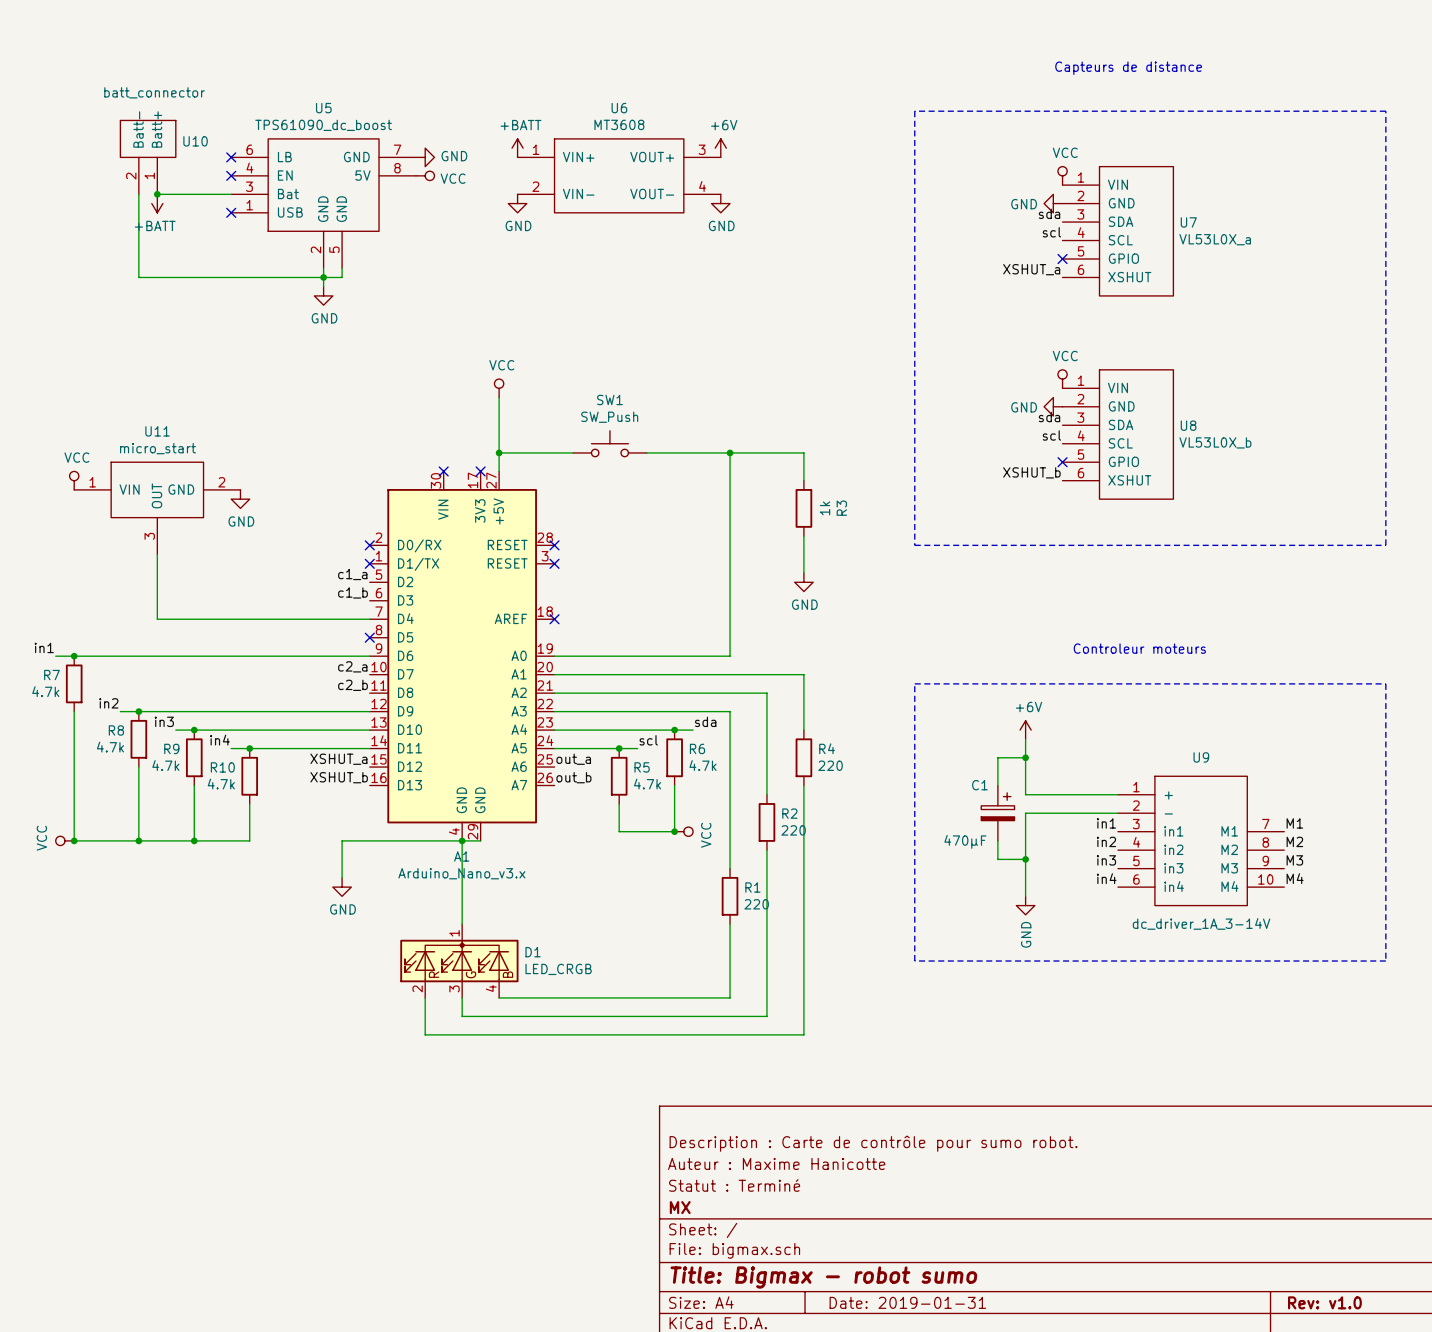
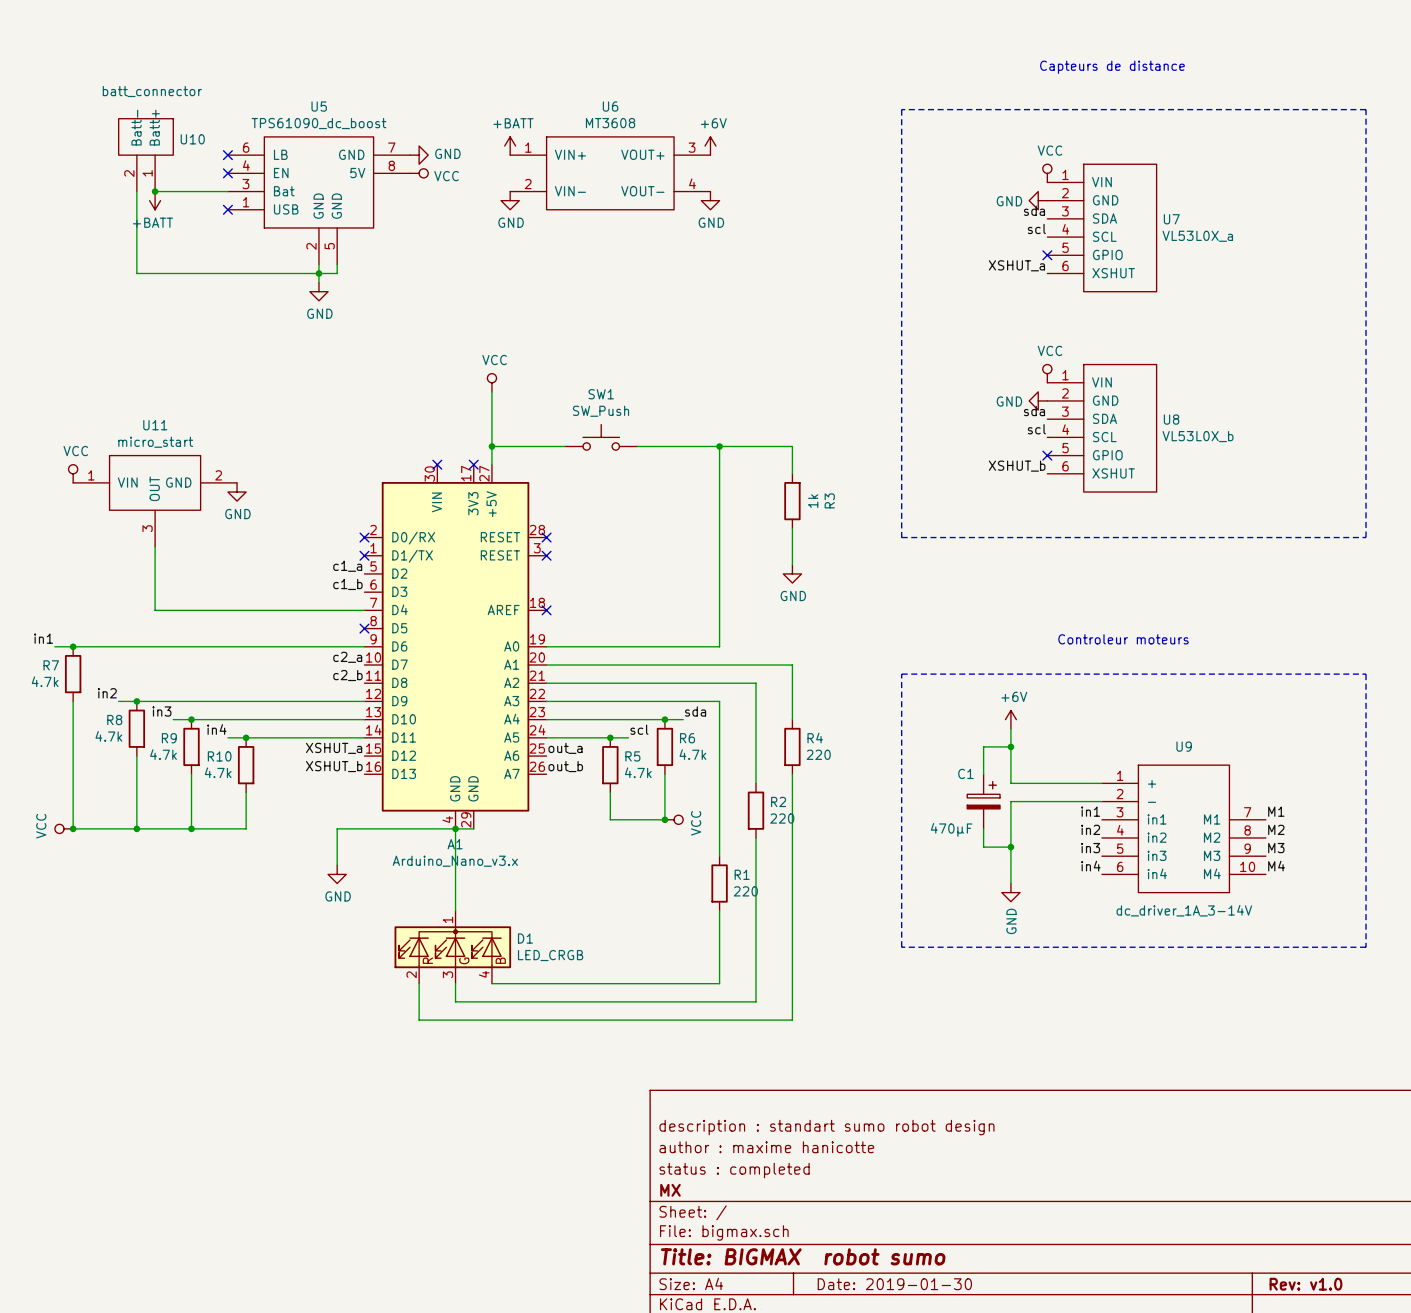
title block: Description : Carte de contrôle pour sumo robot. (873, 1143) -> description : standart sumo robot design (827, 1127)
title block: Auteur : Maxime Hanicotte (776, 1163) -> author : maxime hanicotte (766, 1147)
title block: Statut : Terminé (734, 1185) -> status : completed (734, 1170)
title block: Title: Bigmax - robot sumo (823, 1277) -> Title: BIGMAX robot sumo (803, 1256)
title block: Date: 2019-01-31 (907, 1302) -> Date: 2019-01-30 (894, 1284)

